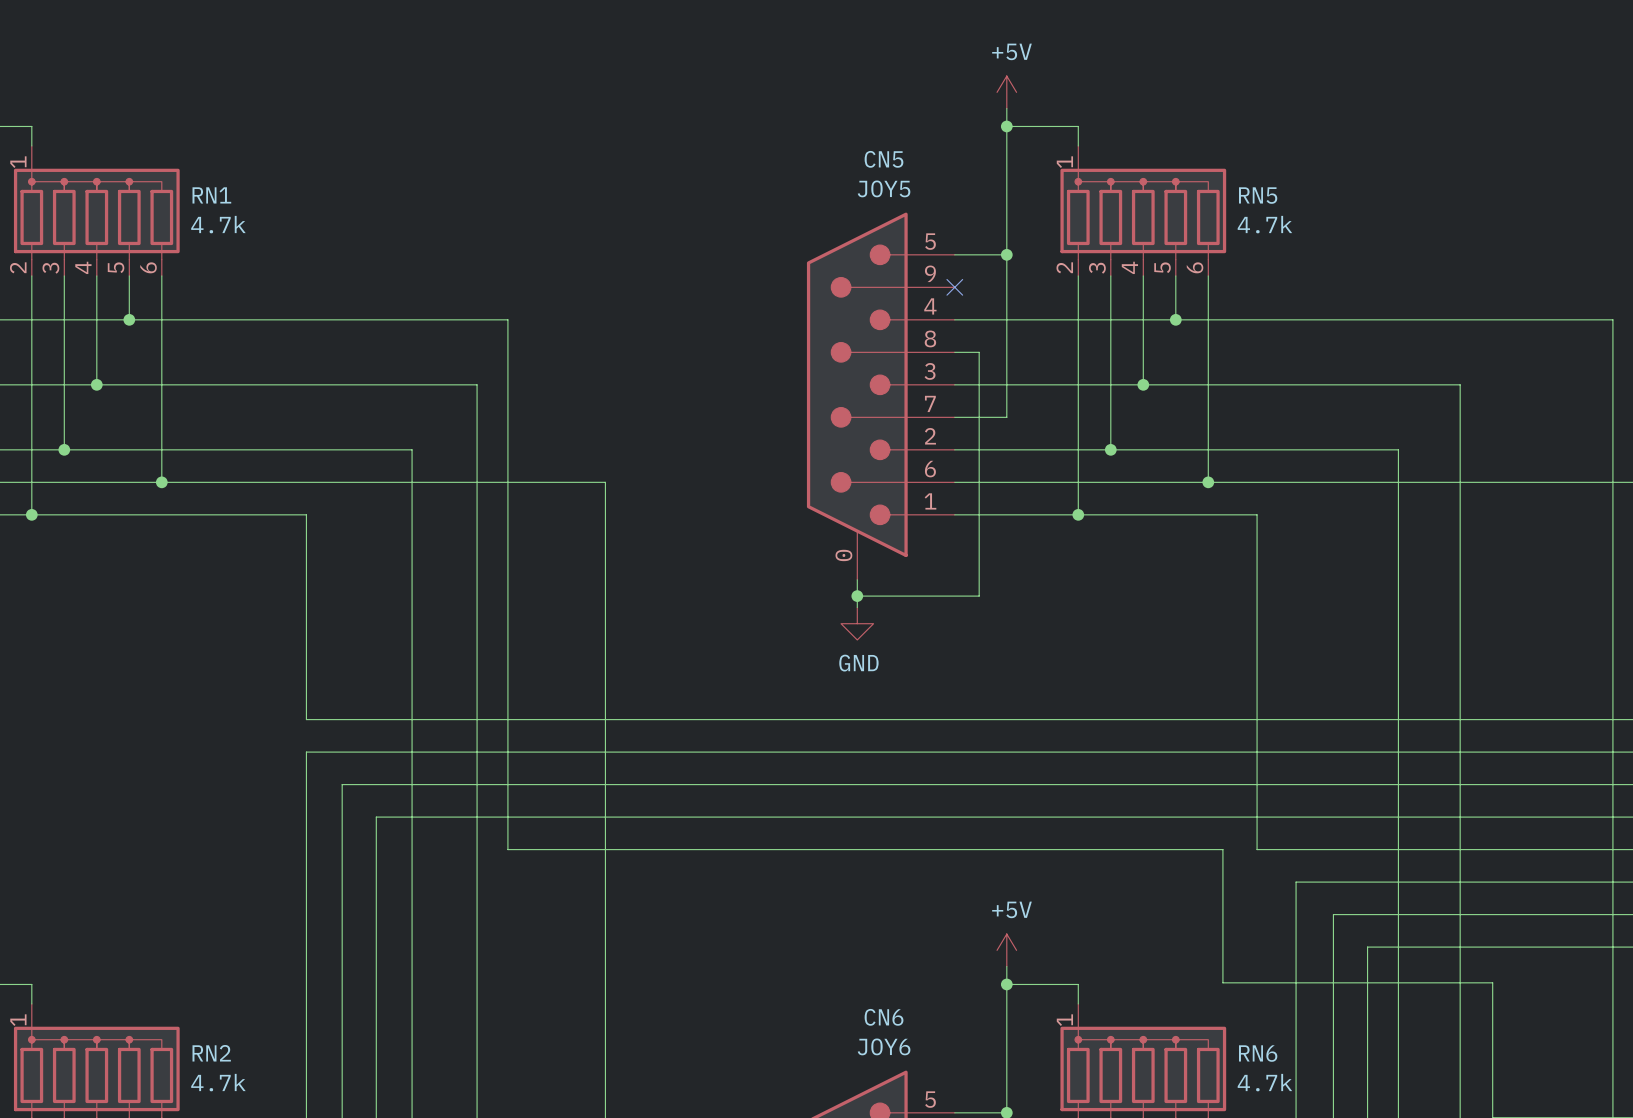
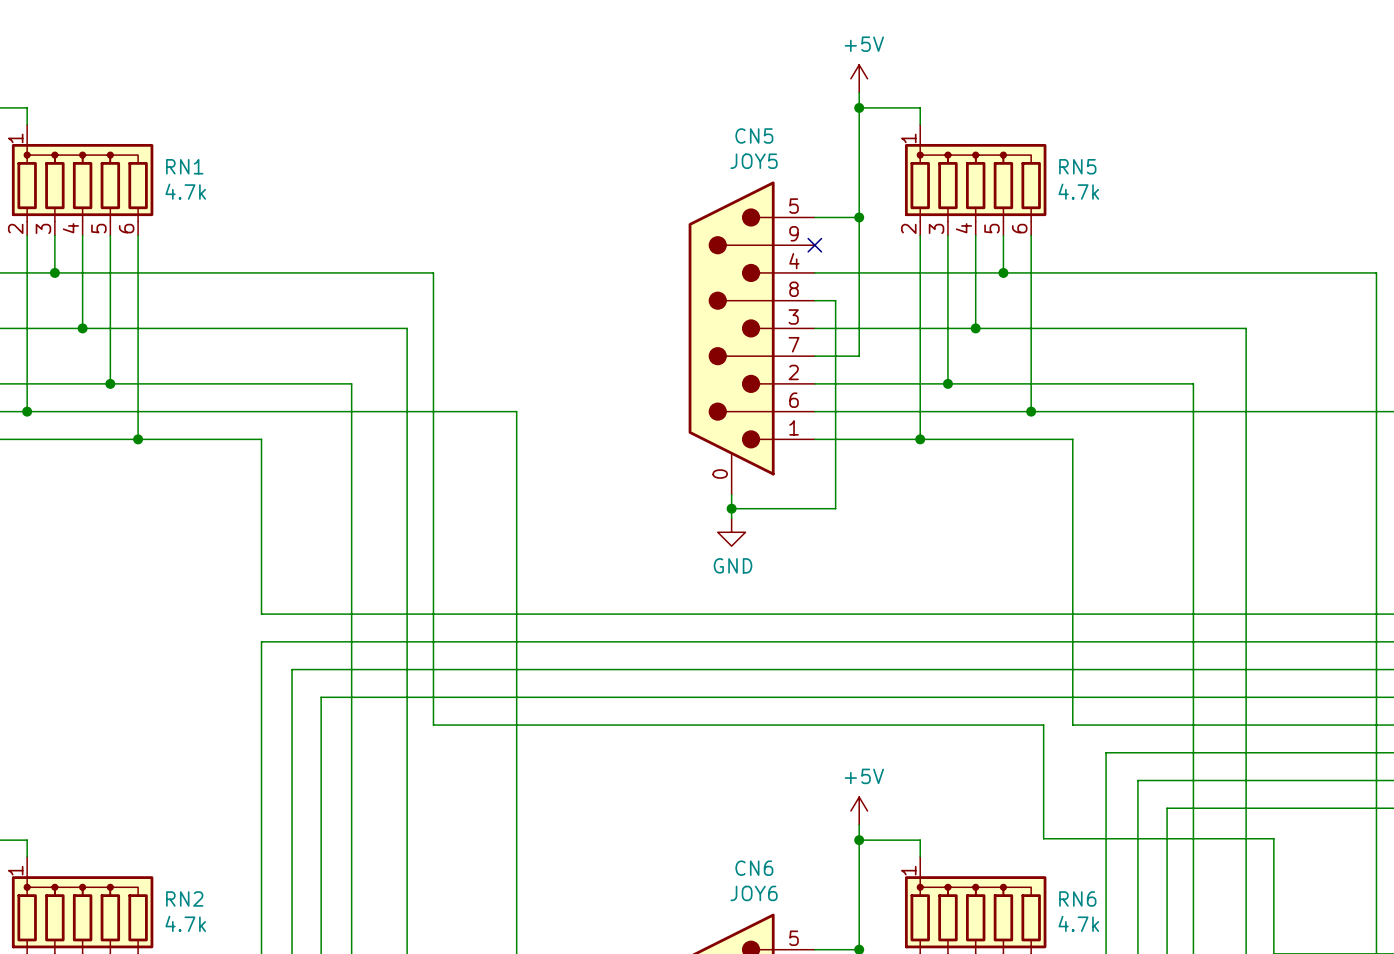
wire: (64, 319) (64, 449) -> (110, 272) (110, 383)
junction: none -> (54, 272)
junction: (129, 319) -> none
junction: (64, 449) -> none
junction: none -> (110, 383)
wire: (31, 482) (31, 514) -> (138, 411) (138, 439)
junction: none -> (27, 411)
junction: (161, 482) -> none
junction: (31, 514) -> none
junction: none -> (138, 439)

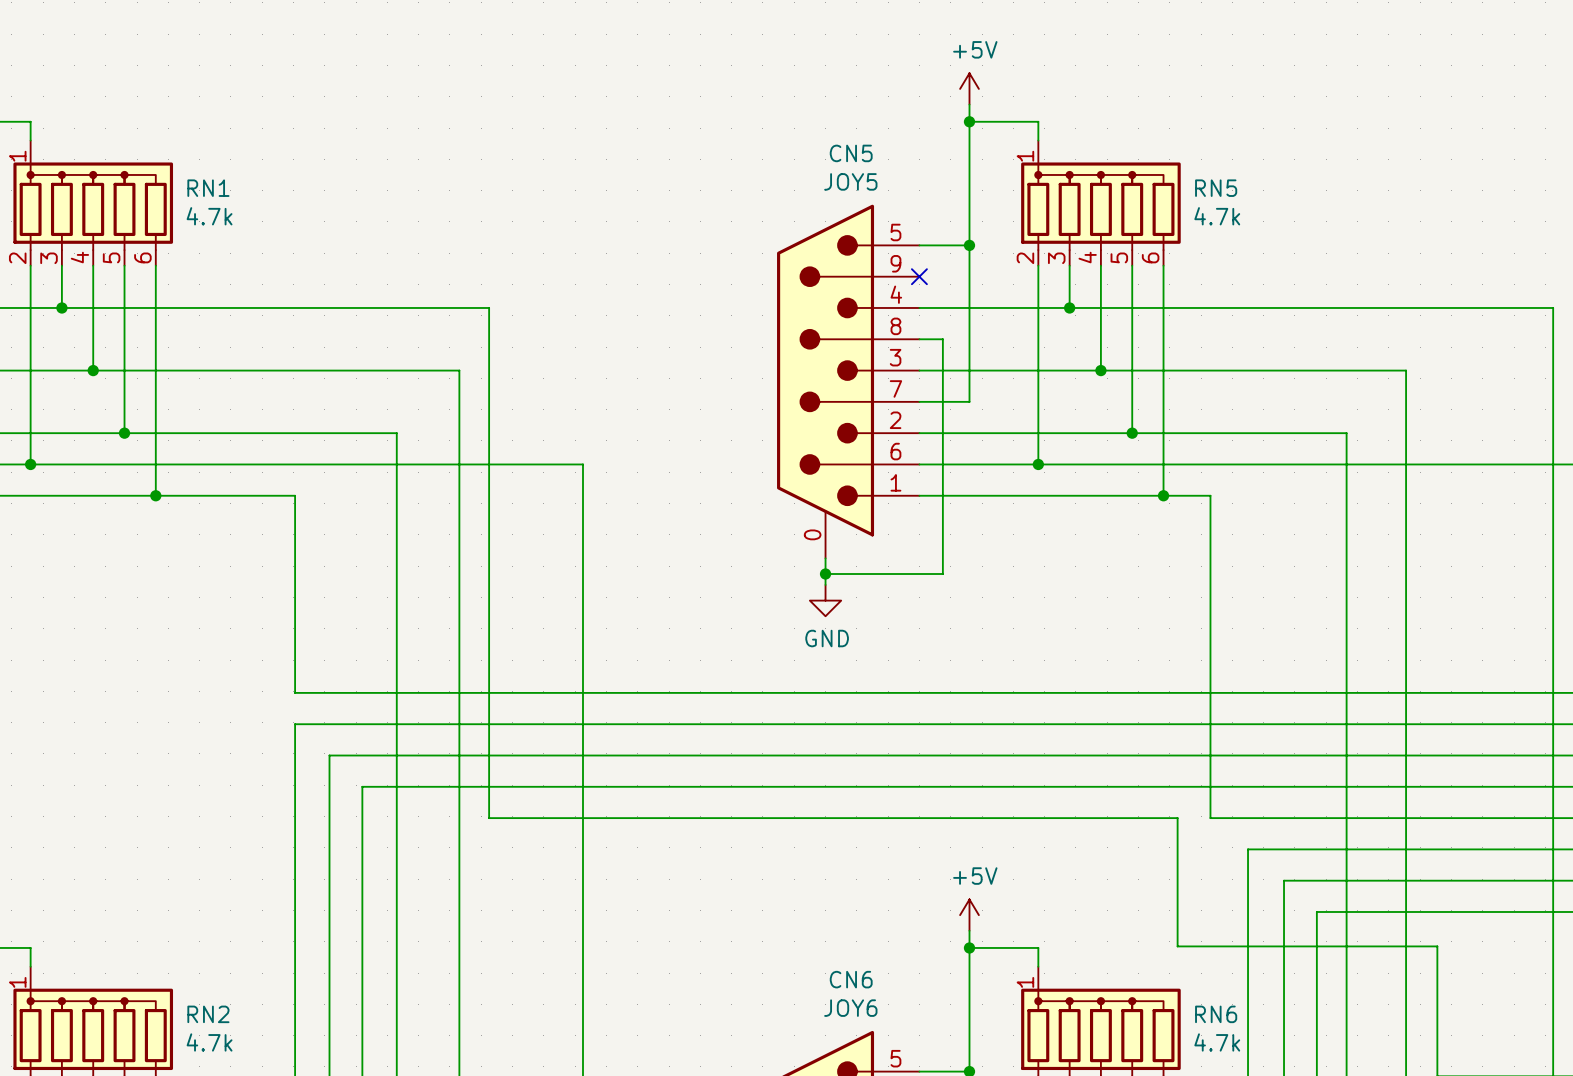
wire: (947, 272) (947, 383) -> (1132, 307) (1132, 433)
junction: none -> (1069, 307)
junction: (1003, 272) -> none
junction: (947, 383) -> none
junction: none -> (1132, 433)
wire: (920, 411) (920, 439) -> (1163, 464) (1163, 495)
junction: none -> (1038, 464)
junction: (1031, 411) -> none
junction: (920, 439) -> none
junction: none -> (1163, 495)

